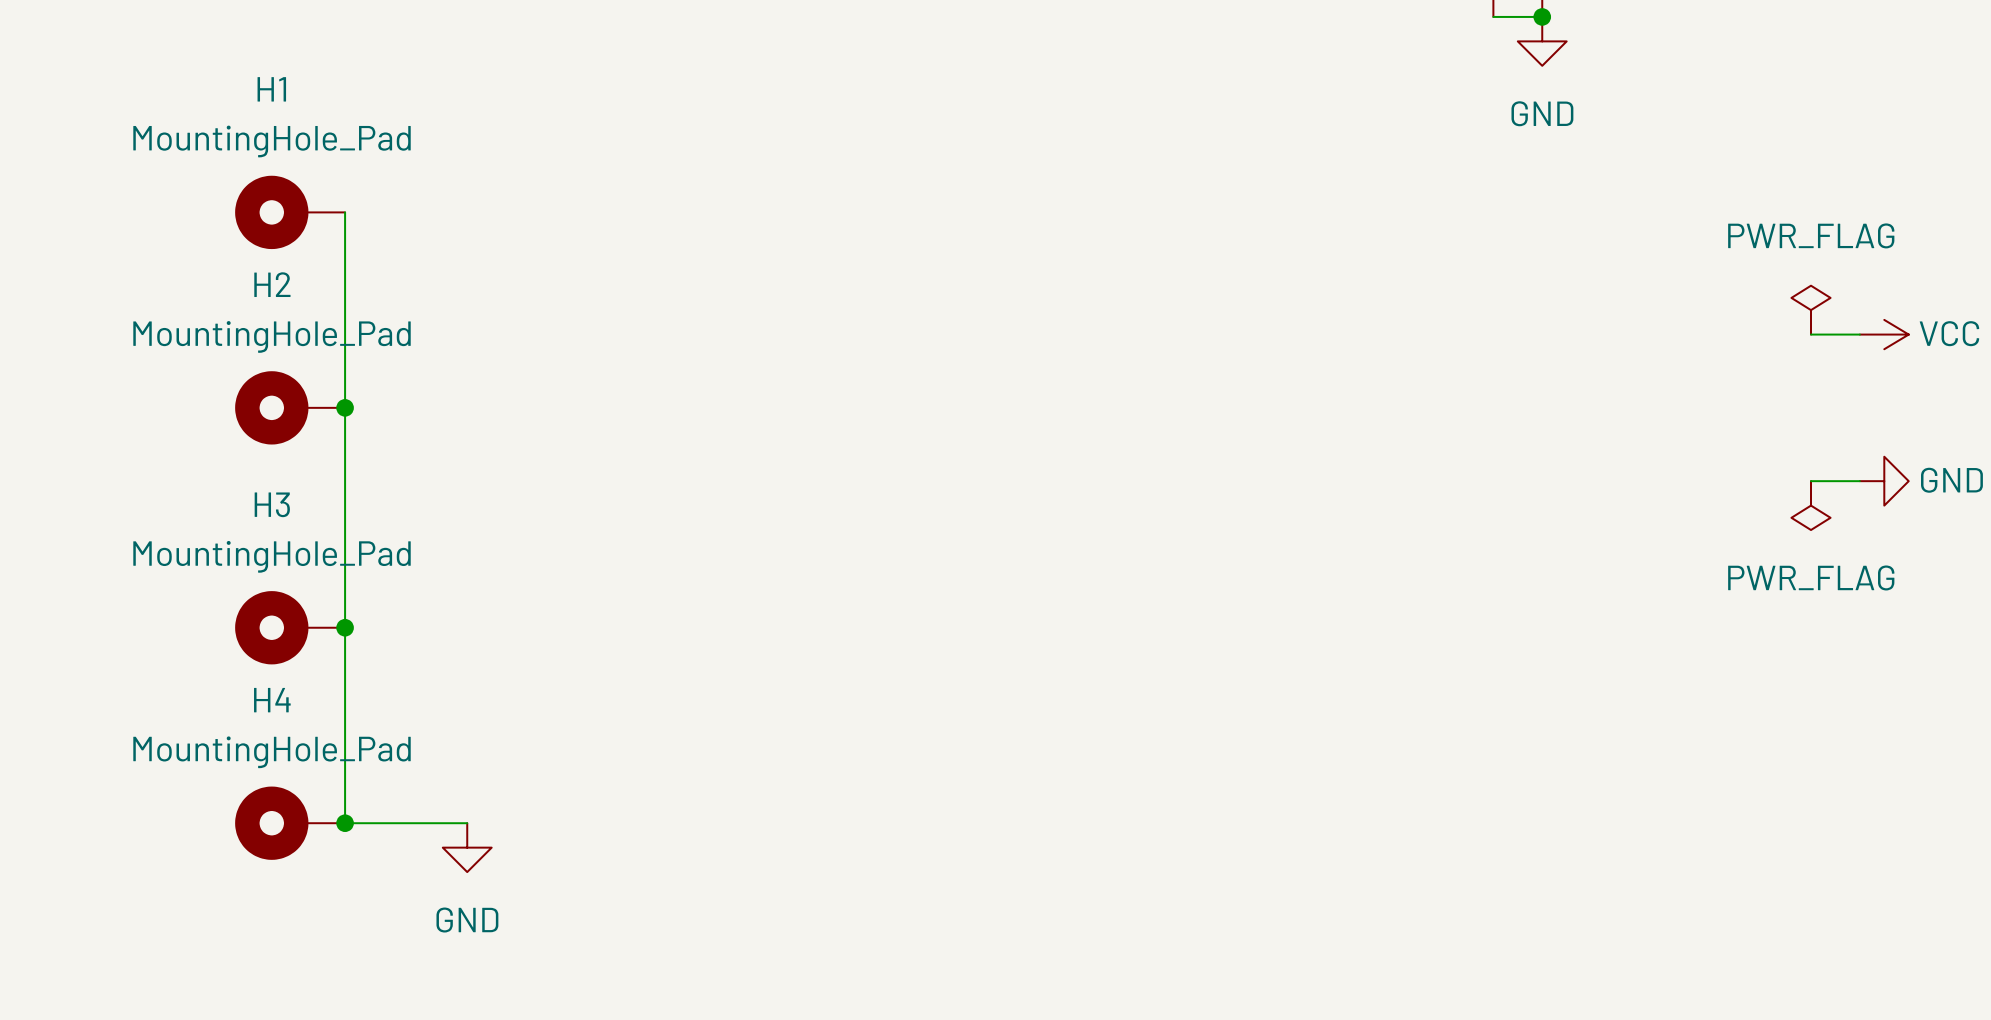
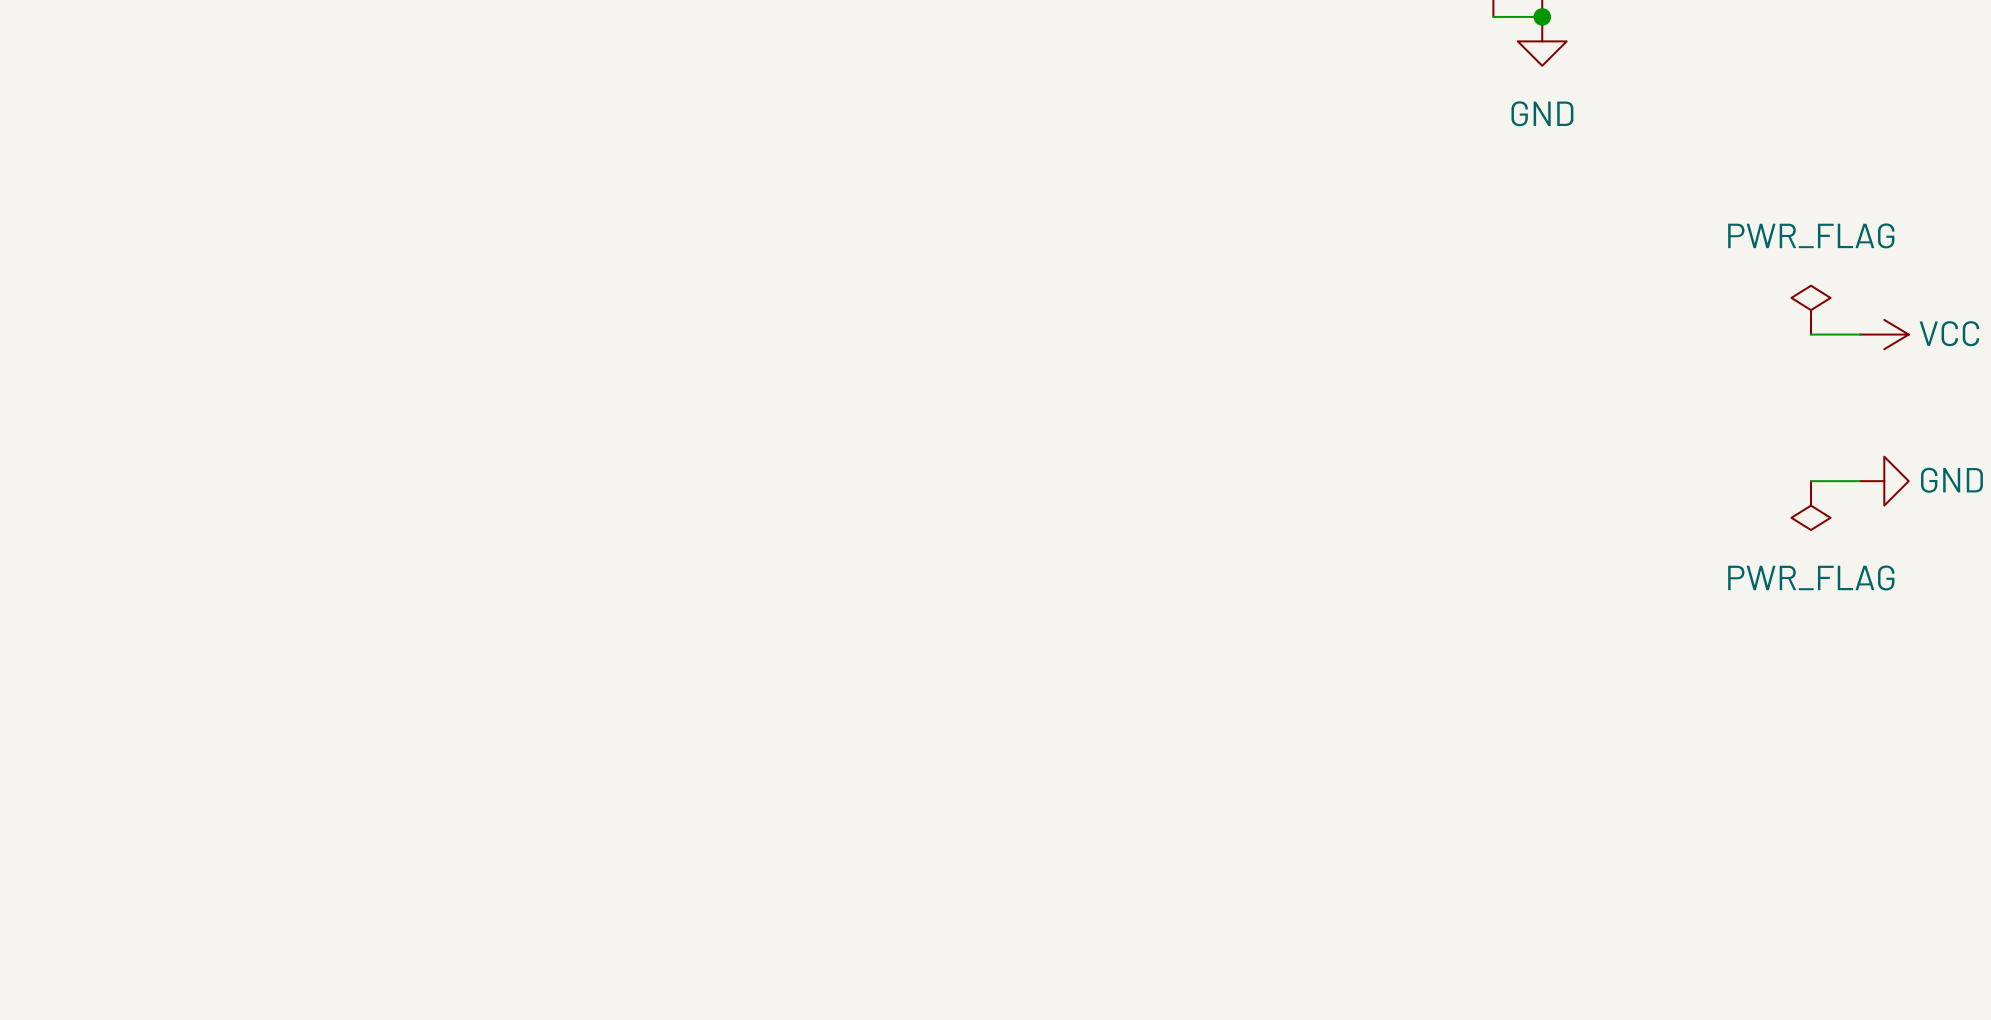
H1: MountingHole_Pad (290, 212) -> none
wire: (345, 212) (345, 823) (467, 823) -> none
H2: MountingHole_Pad (290, 407) -> none
junction: (345, 407) -> none
H3: MountingHole_Pad (290, 627) -> none
junction: (345, 627) -> none
H4: MountingHole_Pad (290, 823) -> none
junction: (345, 823) -> none
power symbol: GND (467, 847) -> none

